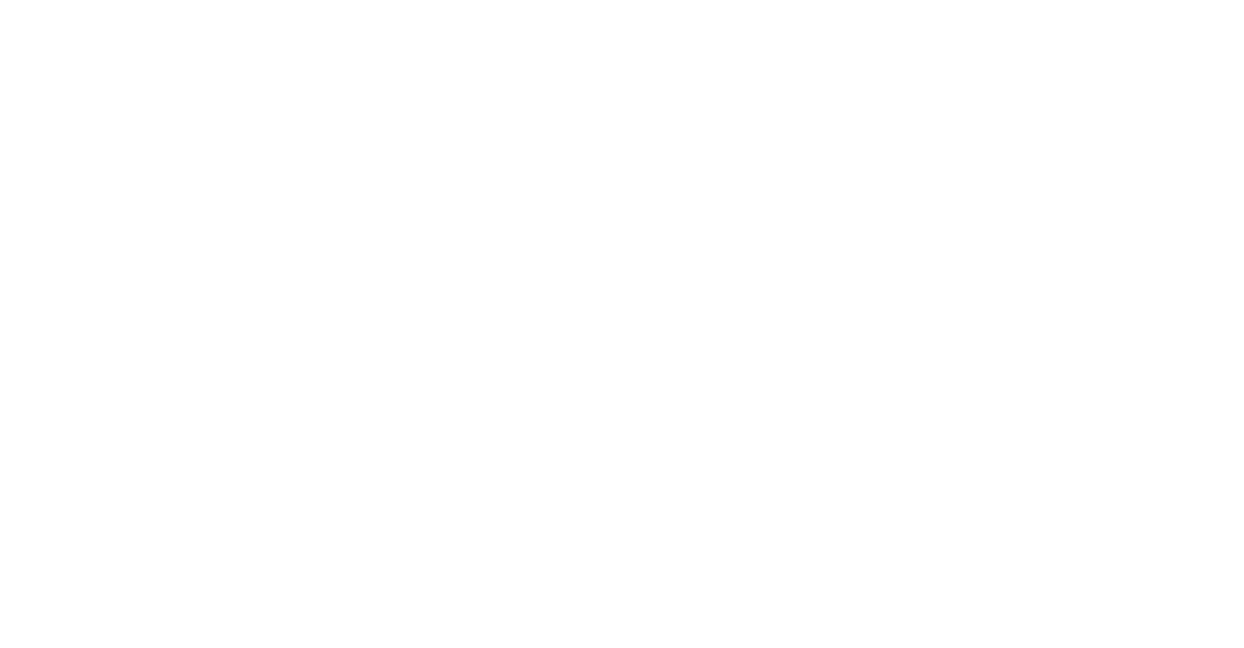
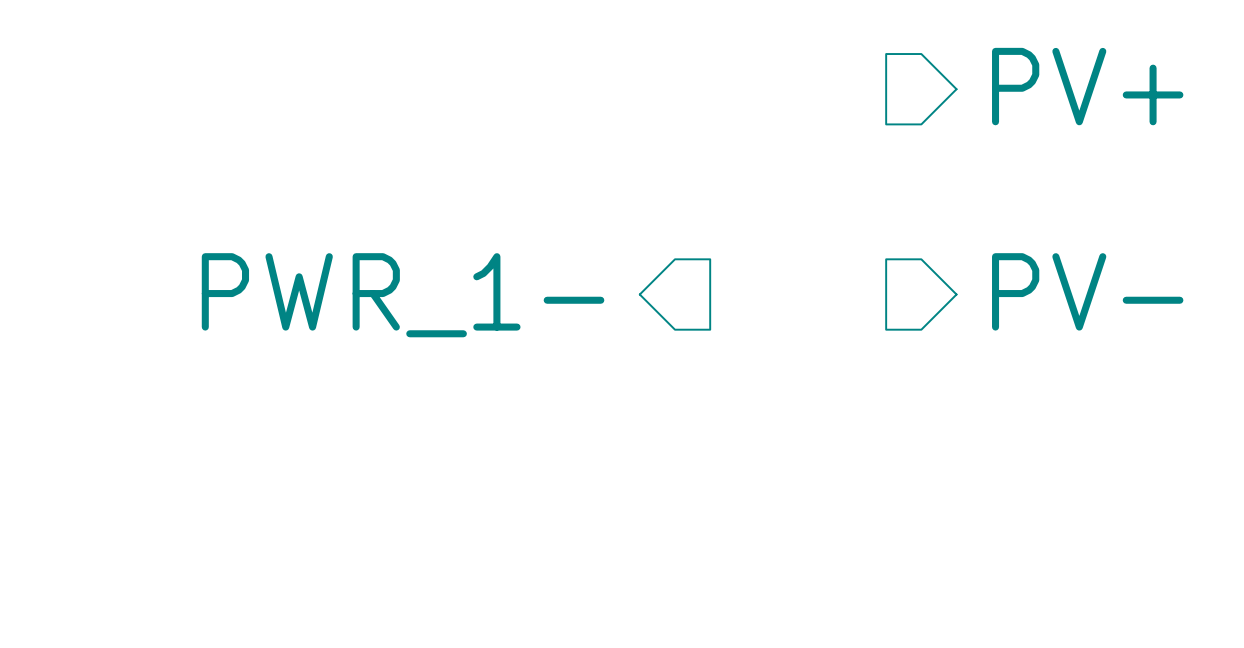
sheet pin: none -> PV+ (1087, 86)
sheet pin: none -> PV- (1087, 291)
sheet pin: none -> PWR_1- (403, 295)

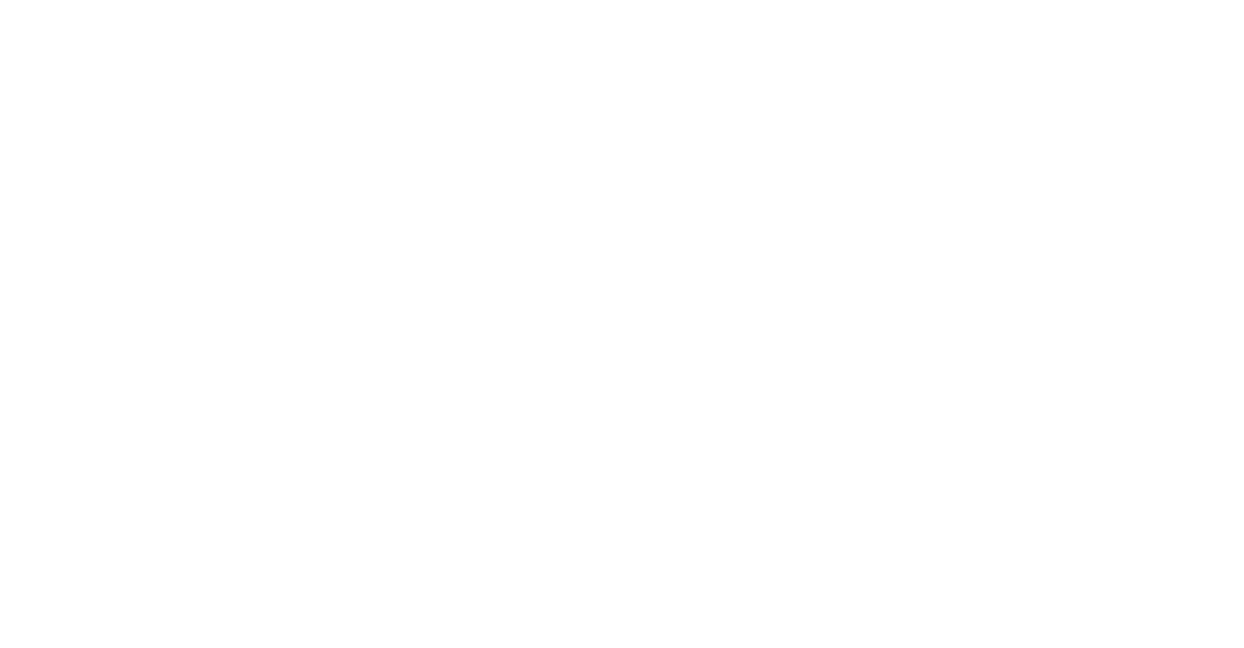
sheet pin: PV+ (1087, 86) -> none
sheet pin: PV- (1087, 291) -> none
sheet pin: PWR_1- (403, 295) -> none

